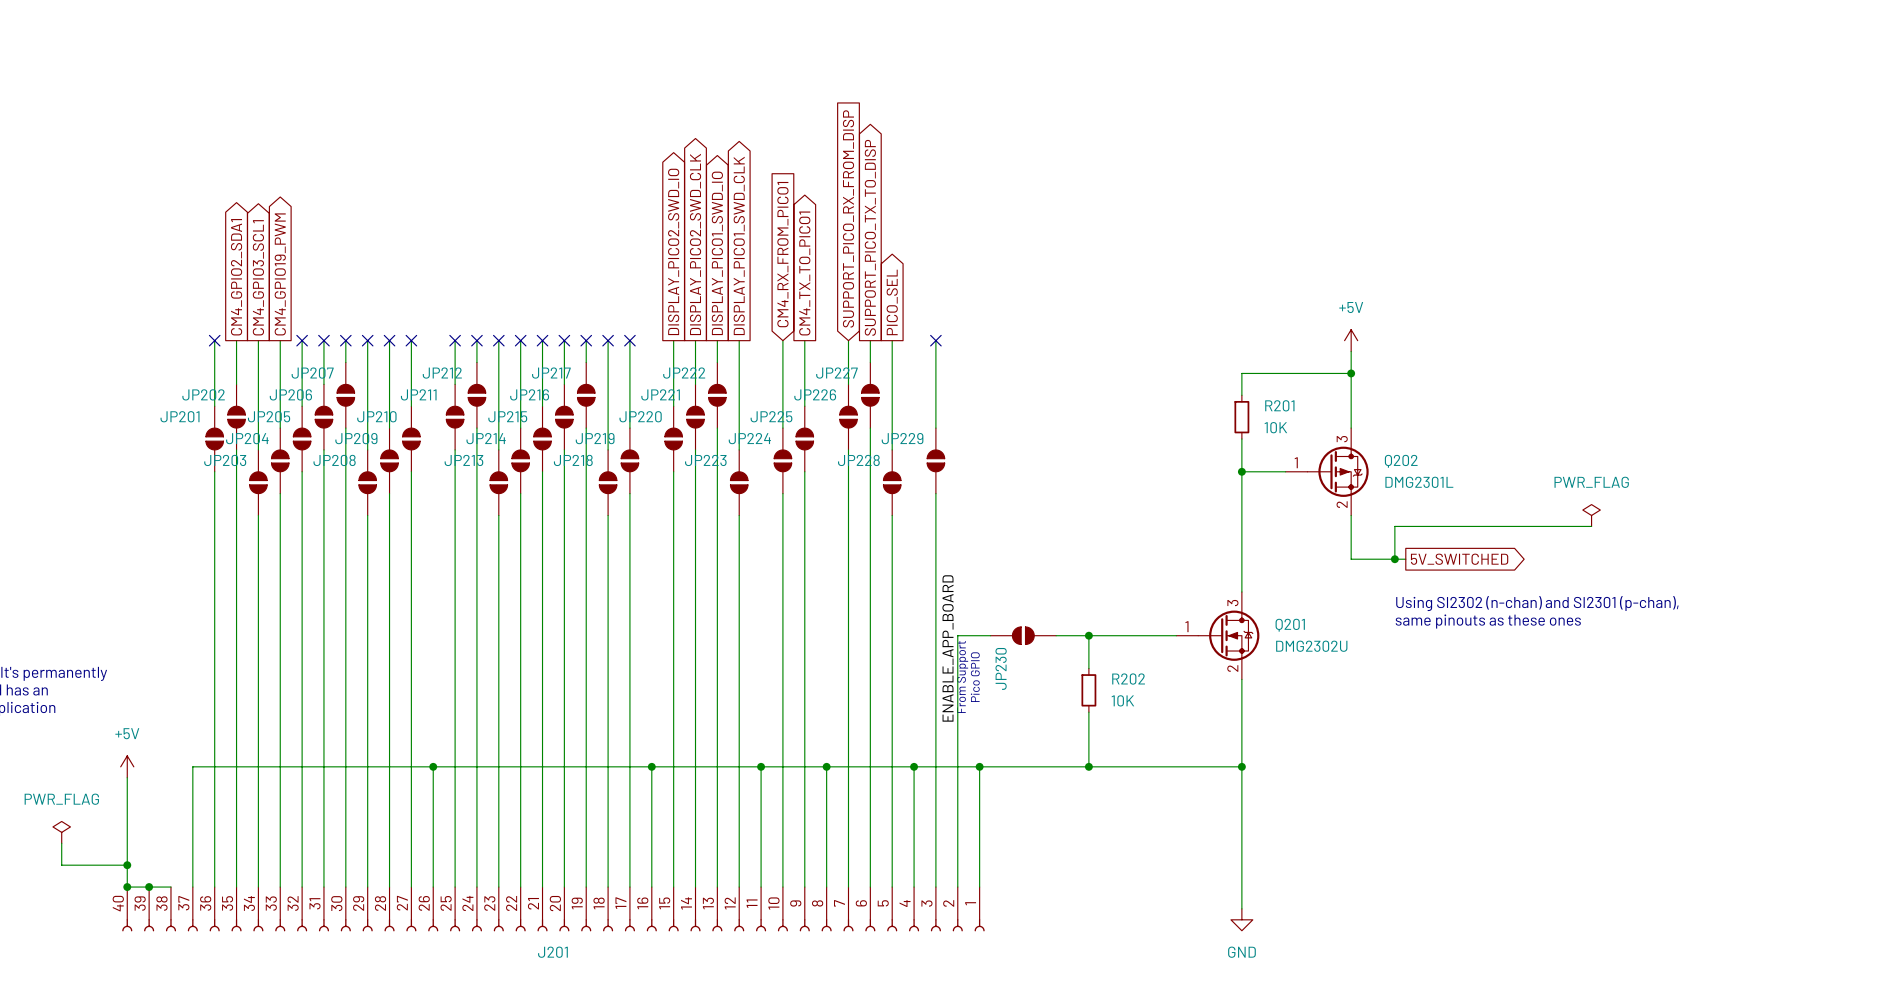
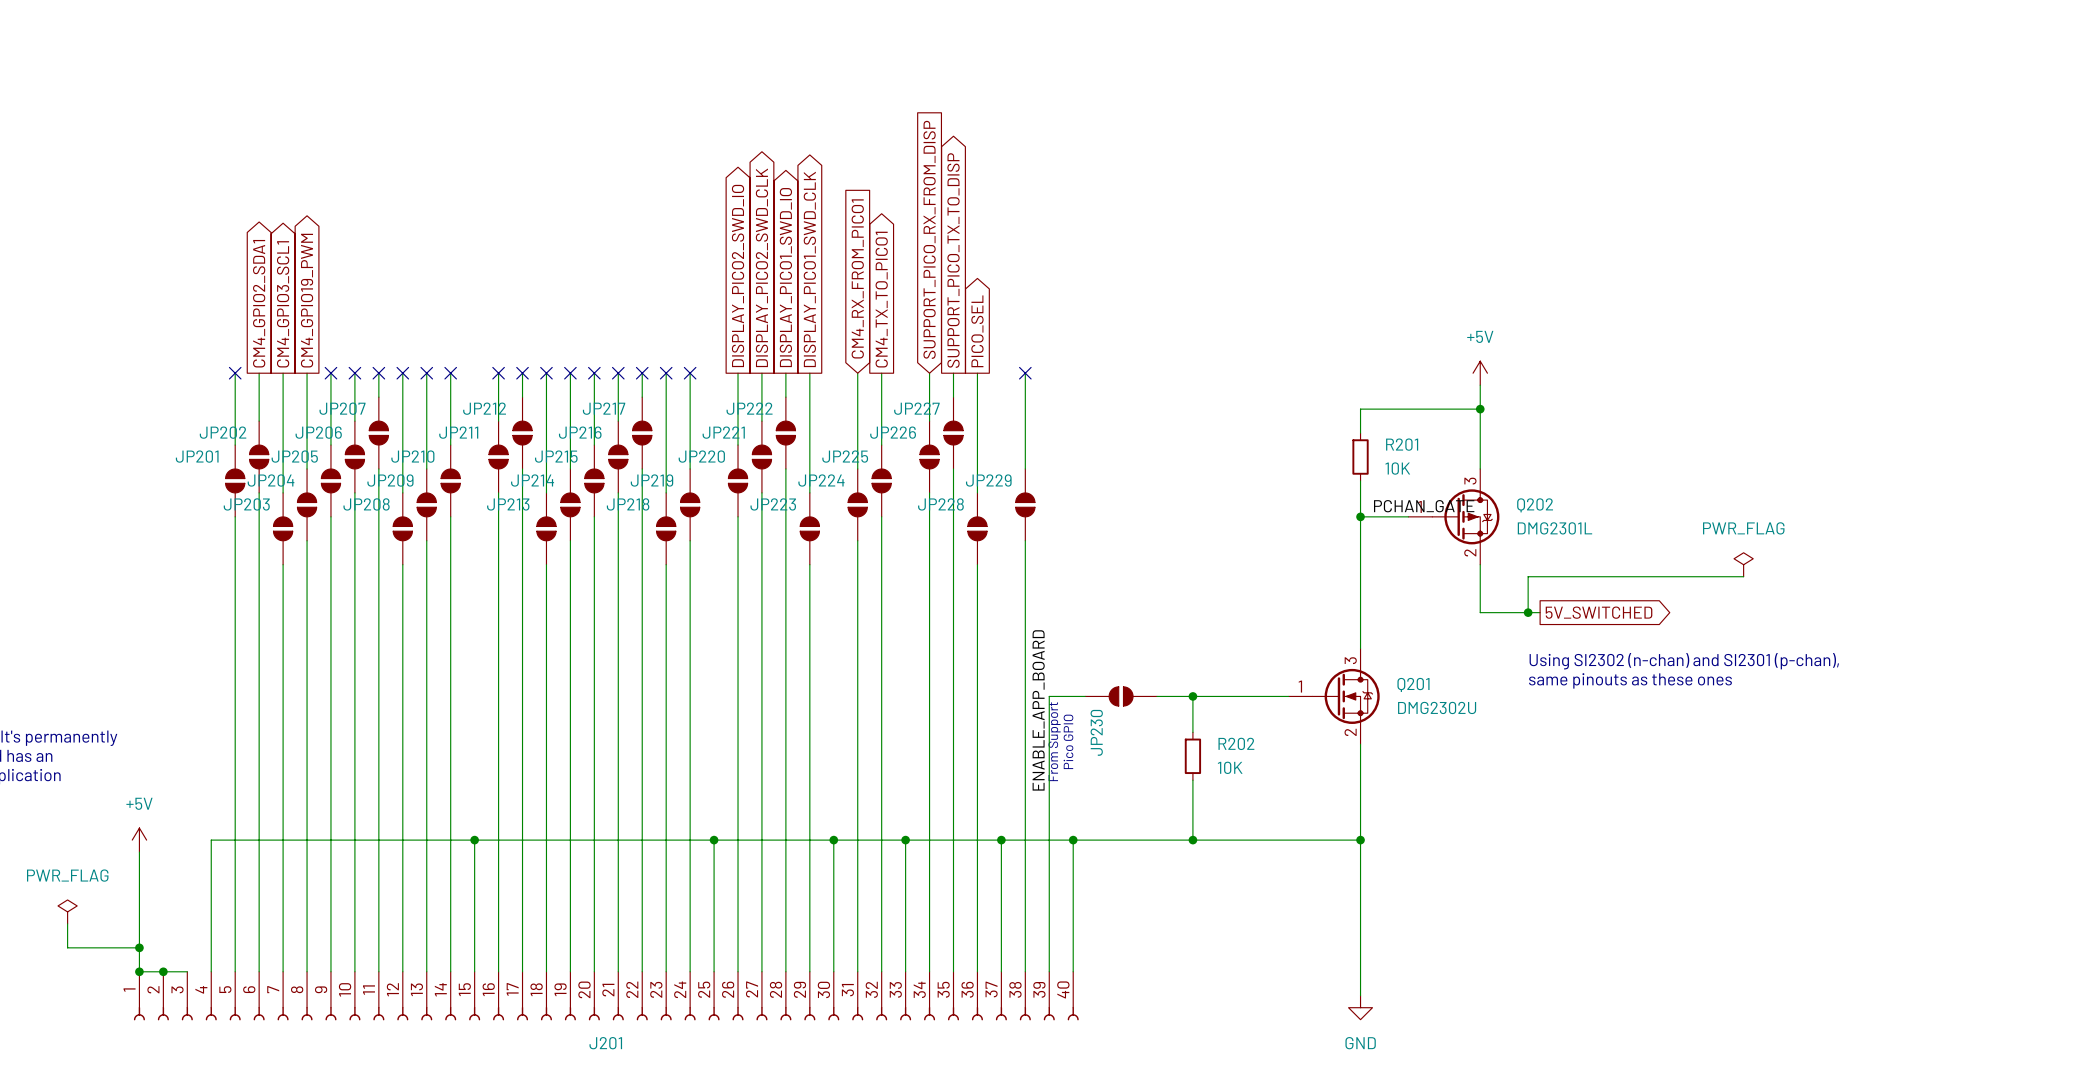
label: none -> PCHAN_GATE (1424, 506)
J201 flip: as is (553, 925) -> left-right (606, 1013)

